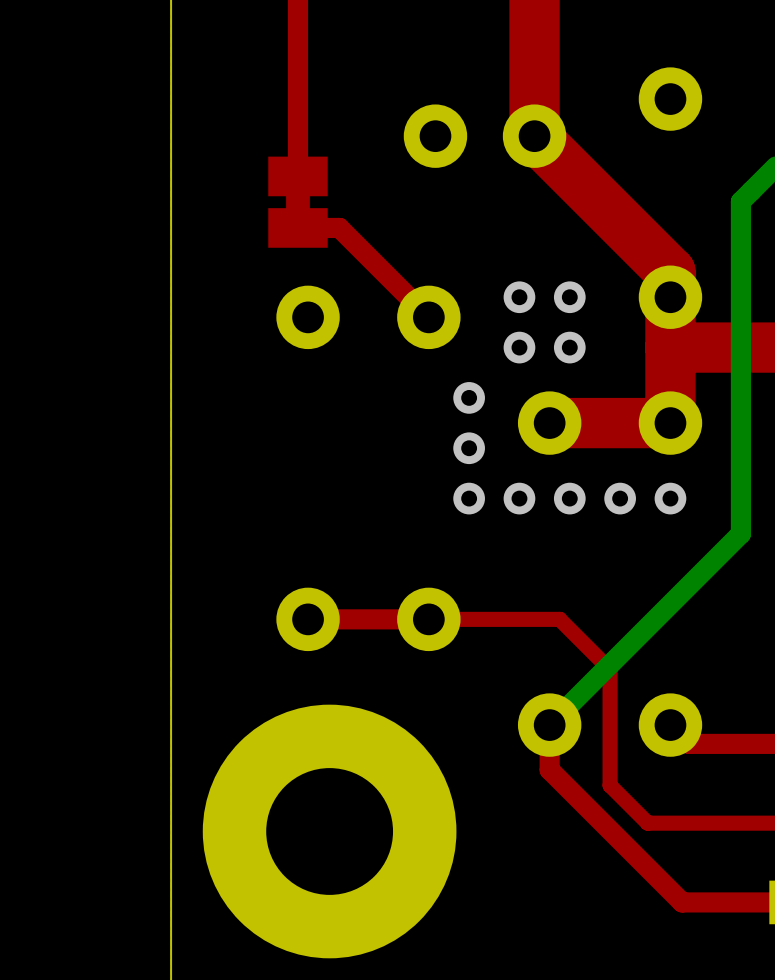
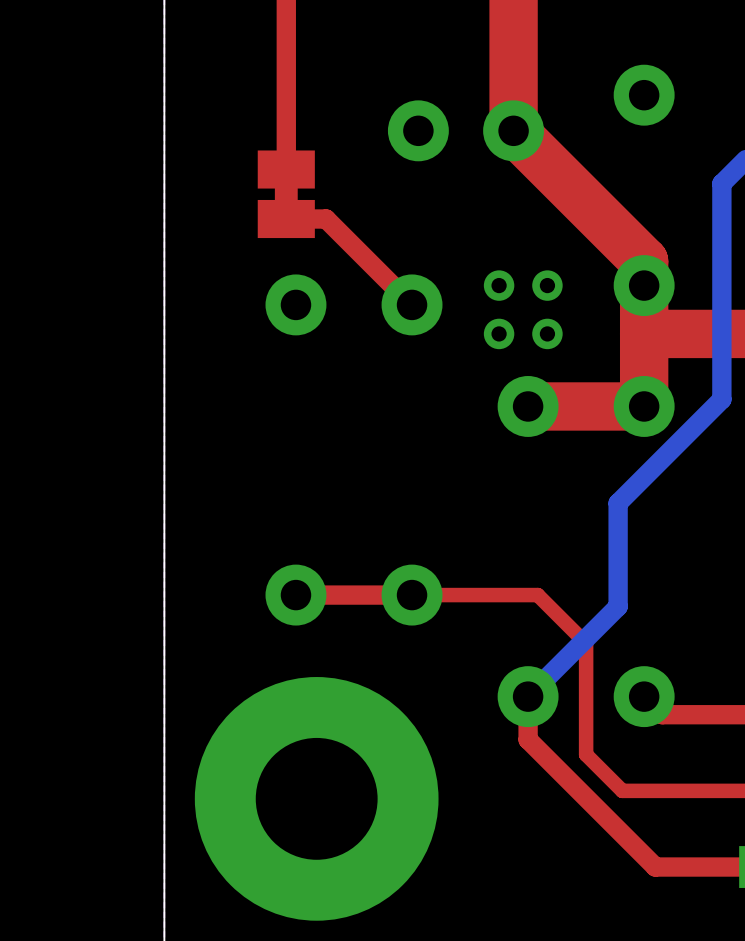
bottom track: (751, 191) (740, 201) (740, 533) (643, 631) -> (721, 183) (721, 399) (618, 503) (618, 606)
via: (469, 397) -> none
via: (469, 448) -> none
via: (469, 498) -> none
via: (519, 498) -> none
via: (569, 498) -> none
via: (620, 498) -> none
via: (670, 498) -> none

